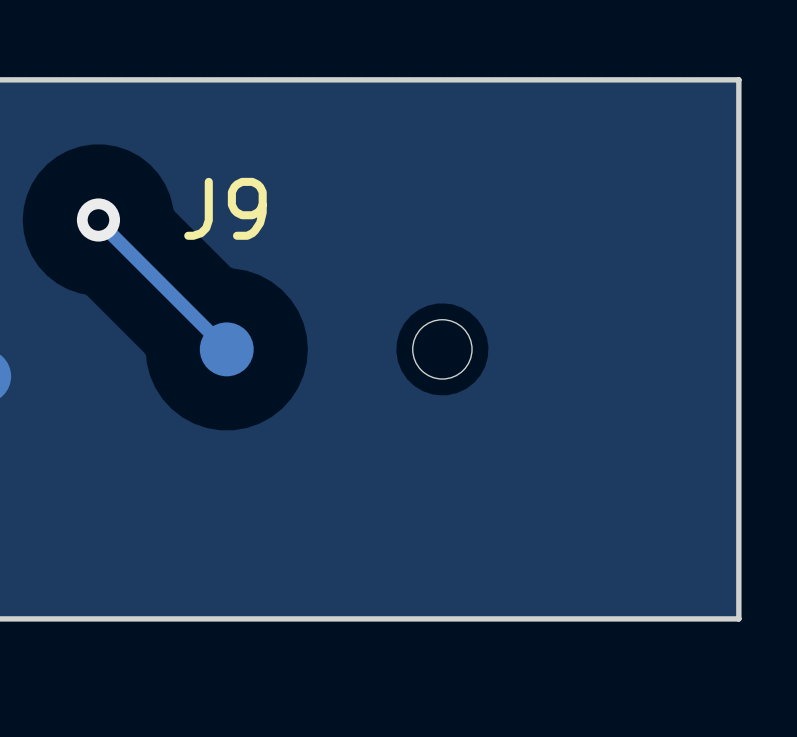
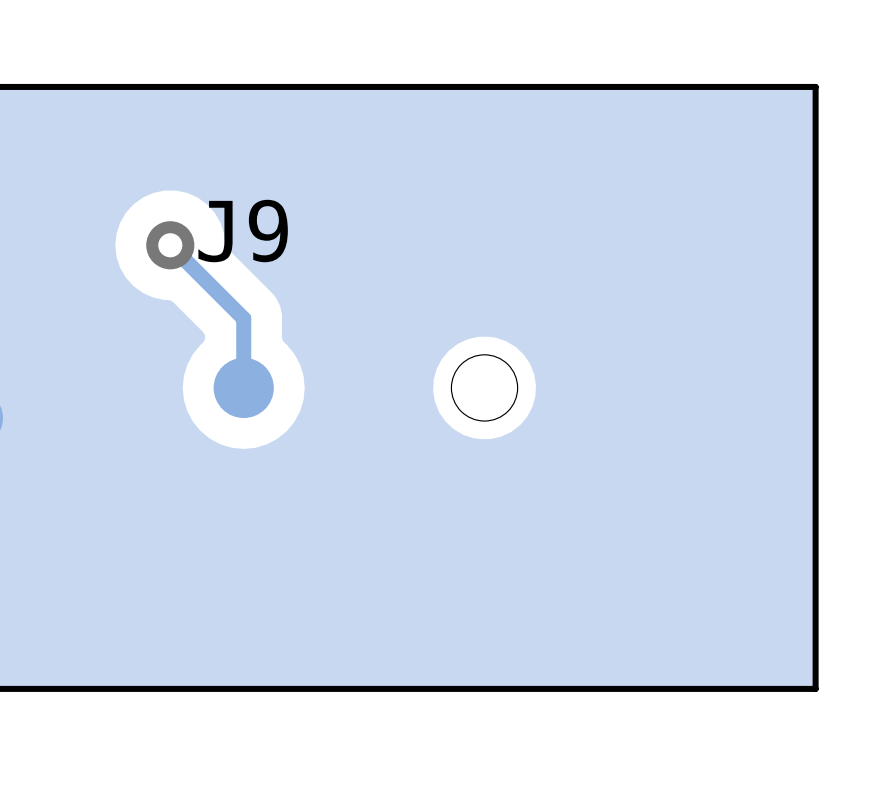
via position: (98, 220) -> (170, 245)
track: (98, 221) (226, 349) -> (170, 245) (243, 318) (243, 387)

